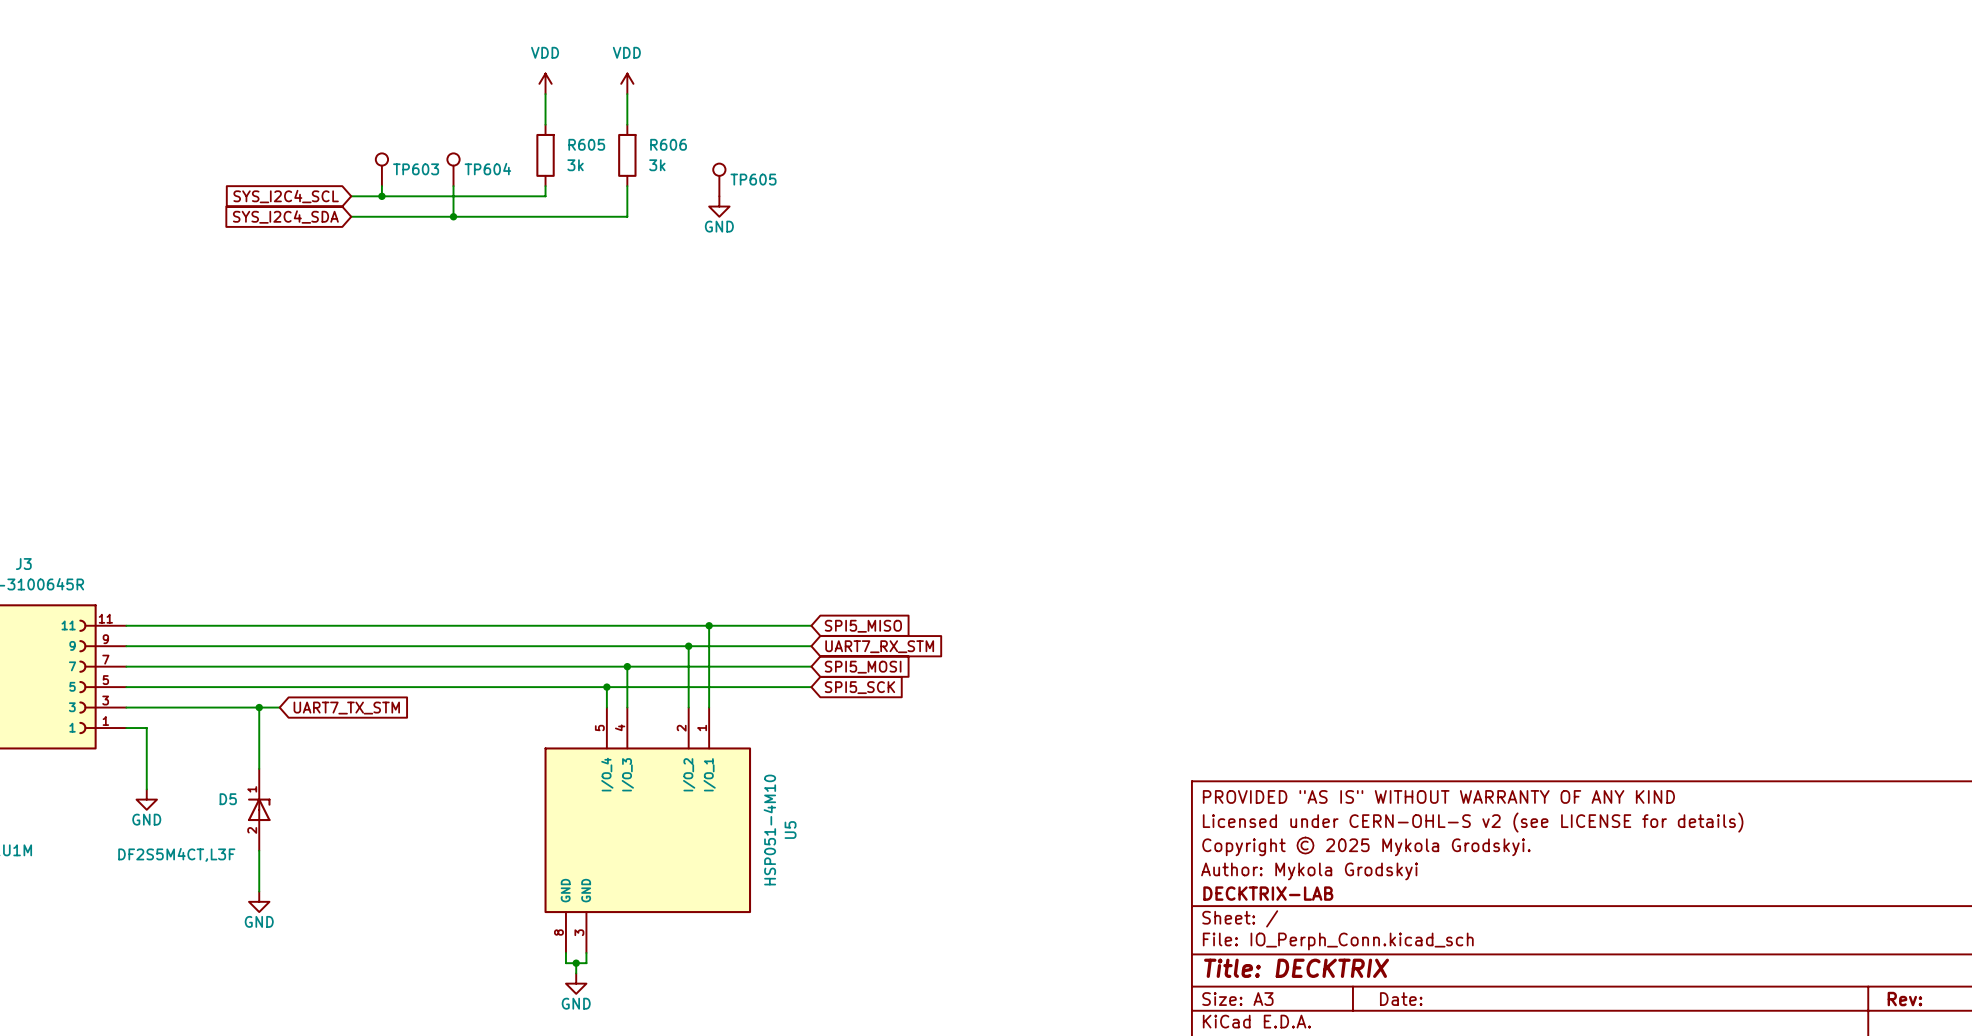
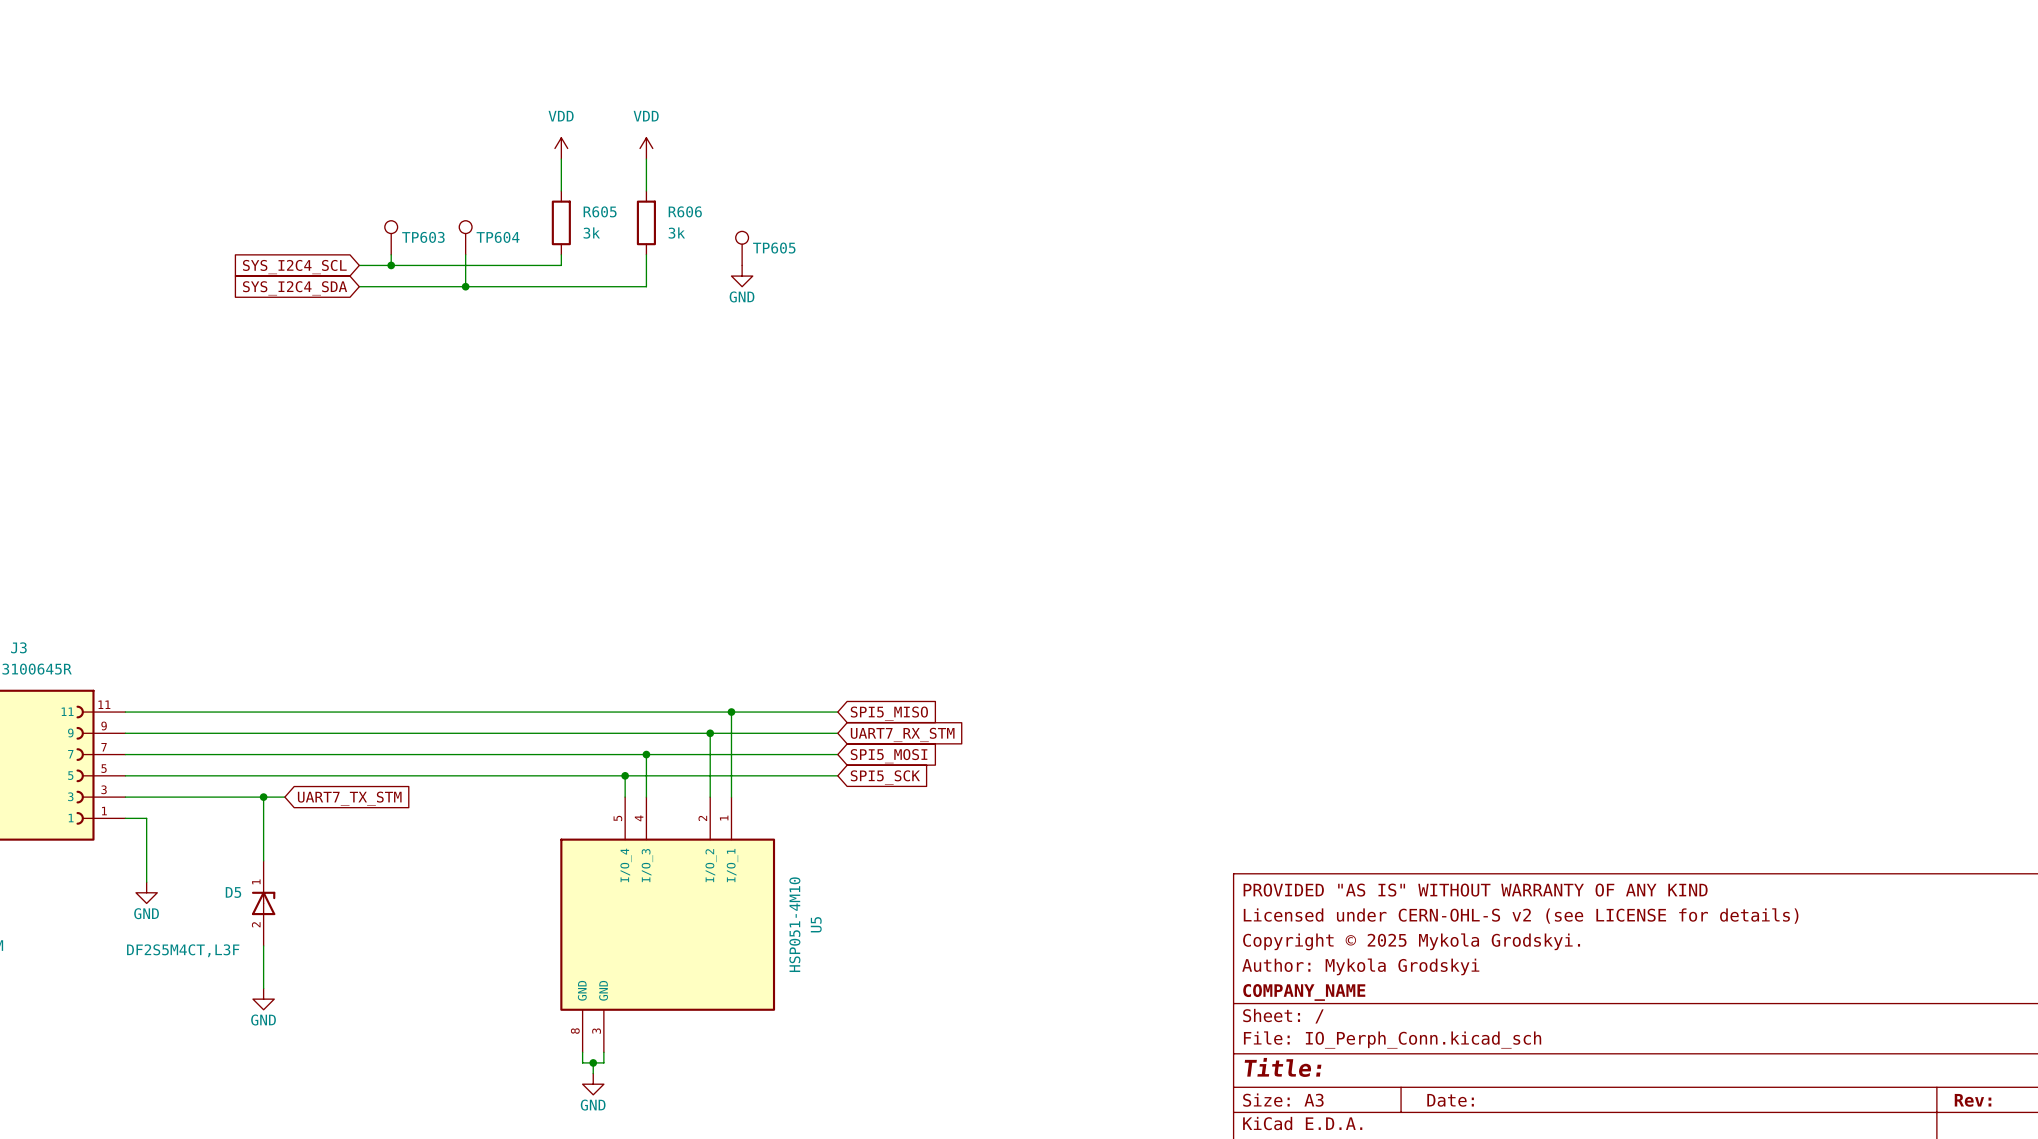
title block: DECKTRIX-LAB (1268, 893) -> COMPANY_NAME (1304, 992)
title block: Title: DECKTRIX (1296, 968) -> Title: (1283, 1067)

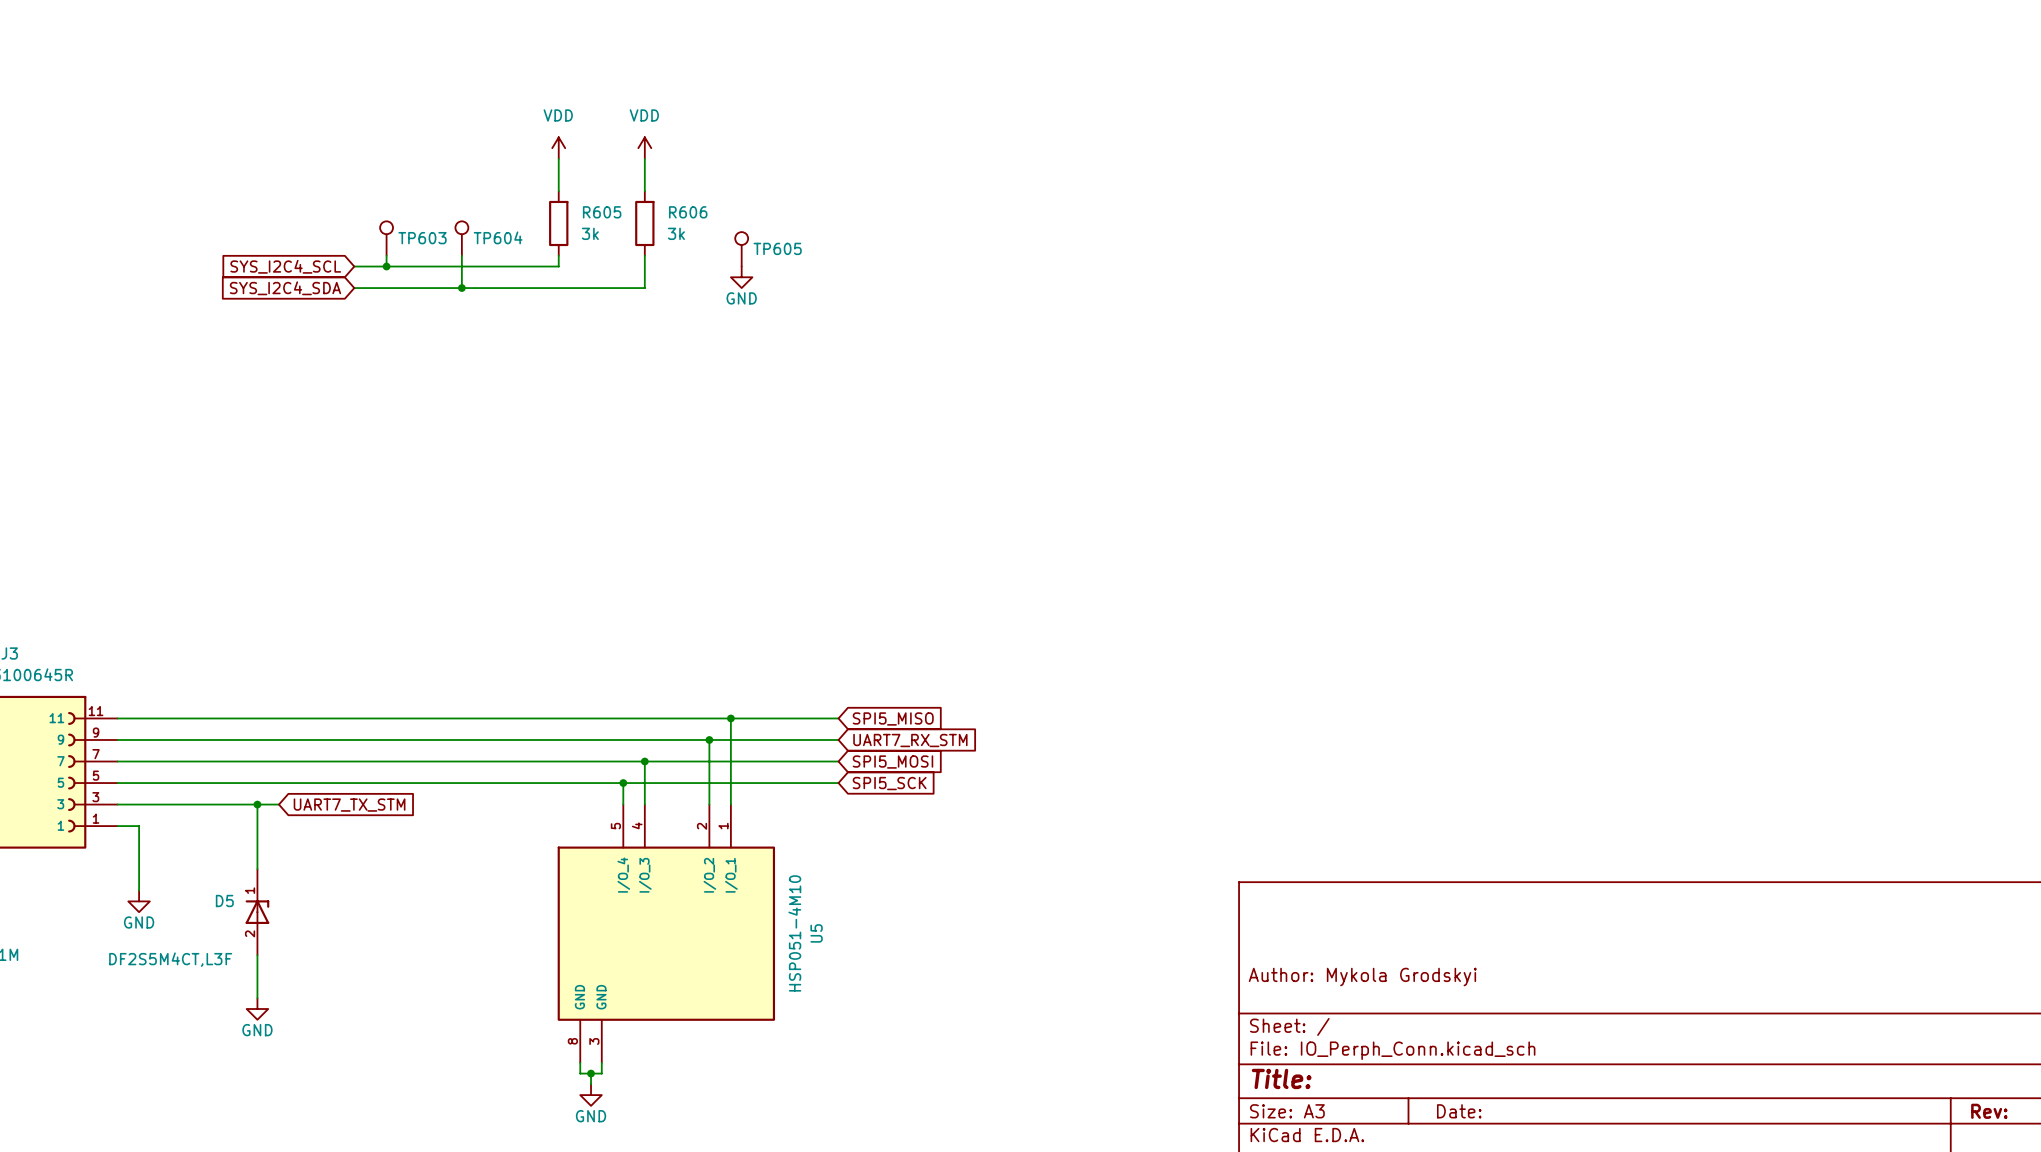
title block: PROVIDED "AS IS" WITHOUT WARRANTY OF ANY KIND (1475, 890) -> none
title block: Licensed under CERN-OHL-S v2 (see LICENSE for details) (1521, 916) -> none
title block: Copyright © 2025 Mykola Grodskyi. (1411, 941) -> none
title block: COMPANY_NAME (1304, 992) -> none

